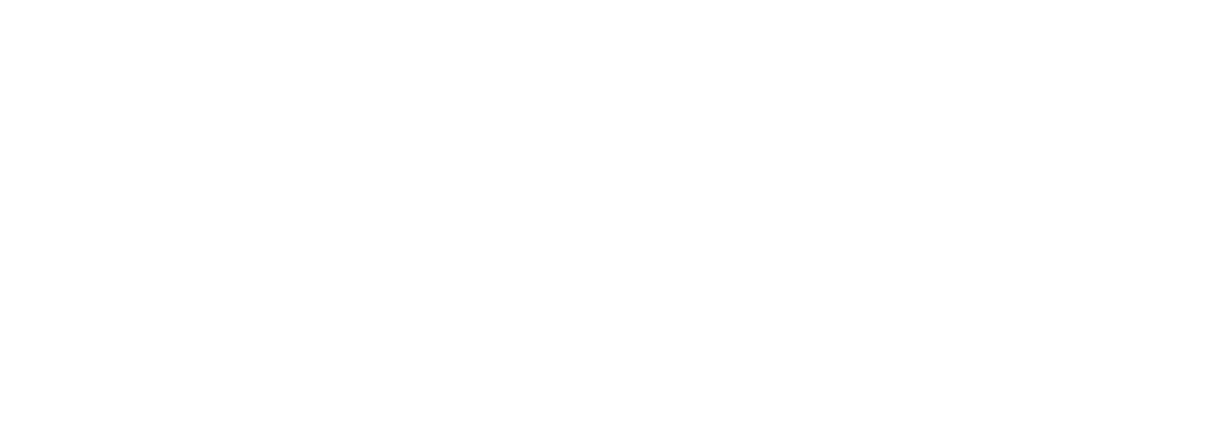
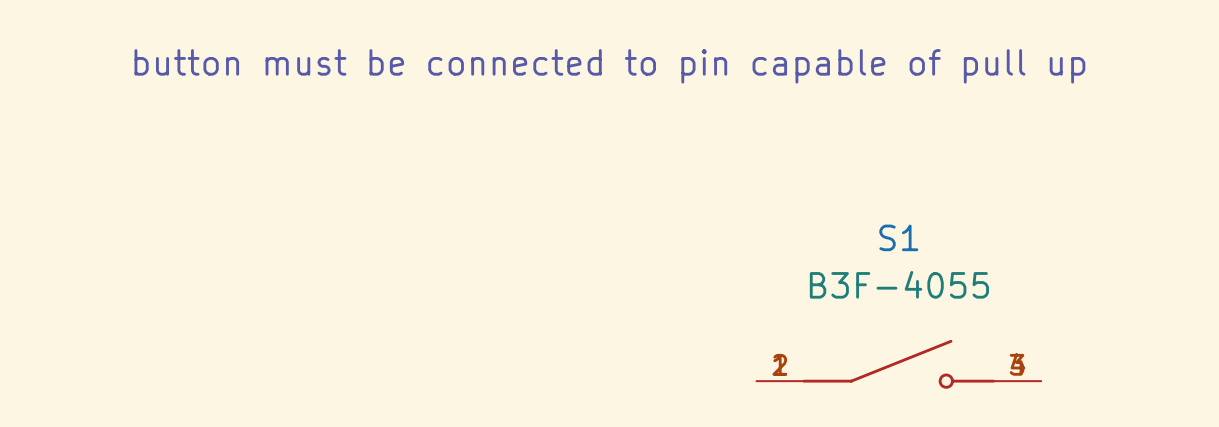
text: none -> button must be connected to pin capable of pull up (609, 66)
S1: none -> B3F-4055 (898, 364)

